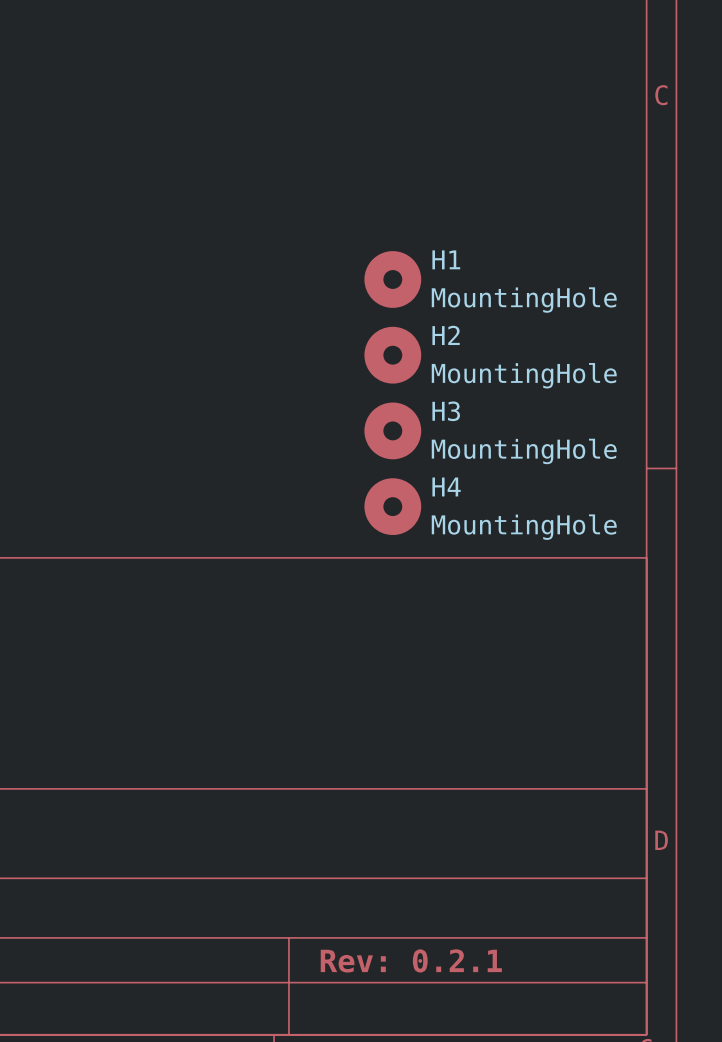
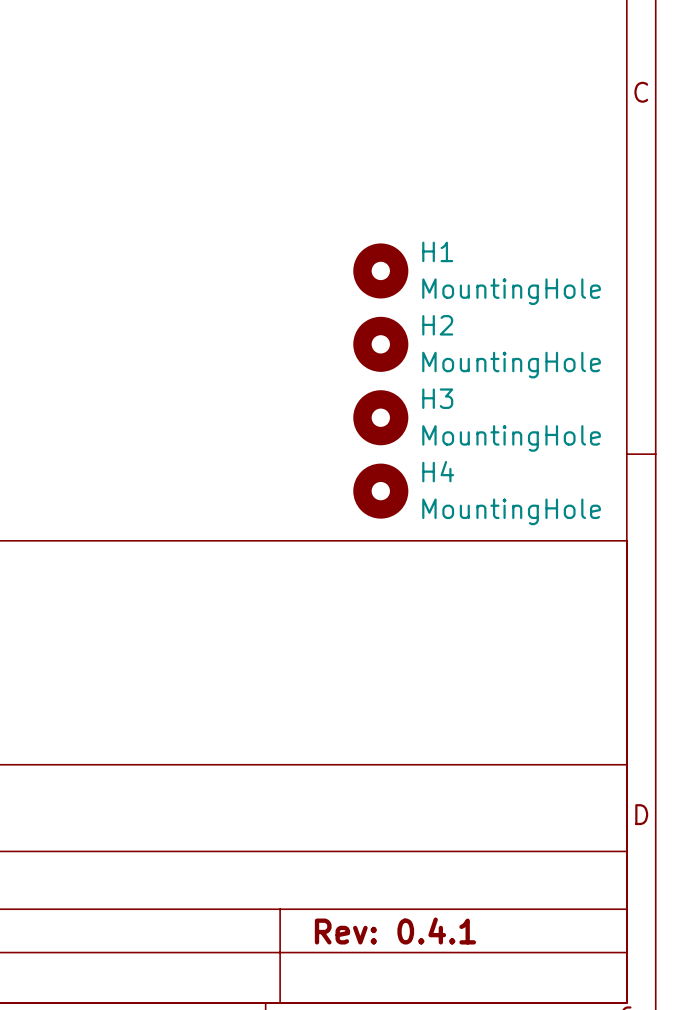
title block: Rev: 0.2.1 (411, 960) -> Rev: 0.4.1 (395, 931)

